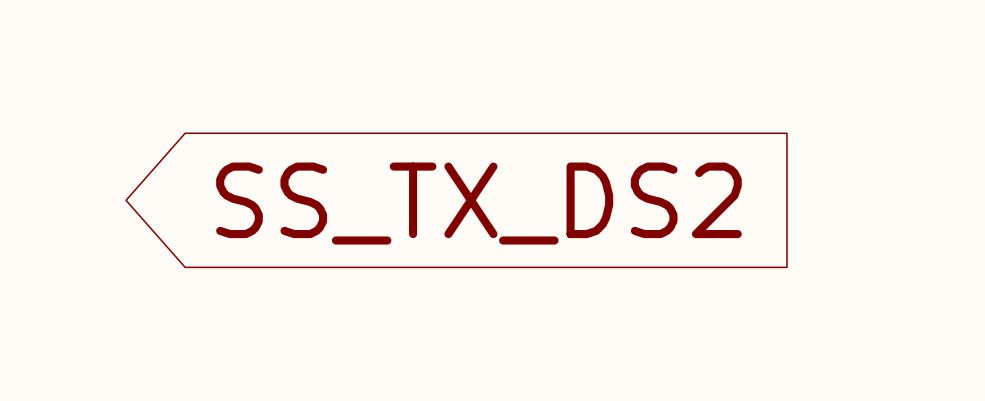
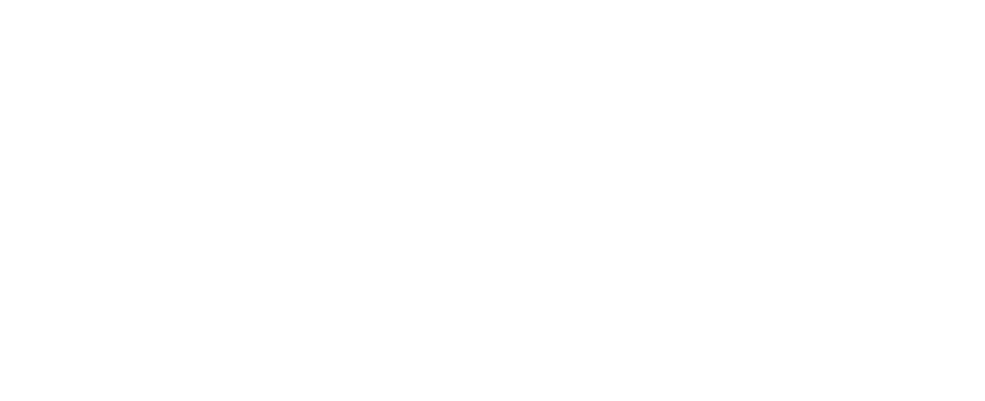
global label: SS_TX_DS2 (478, 203) -> none

